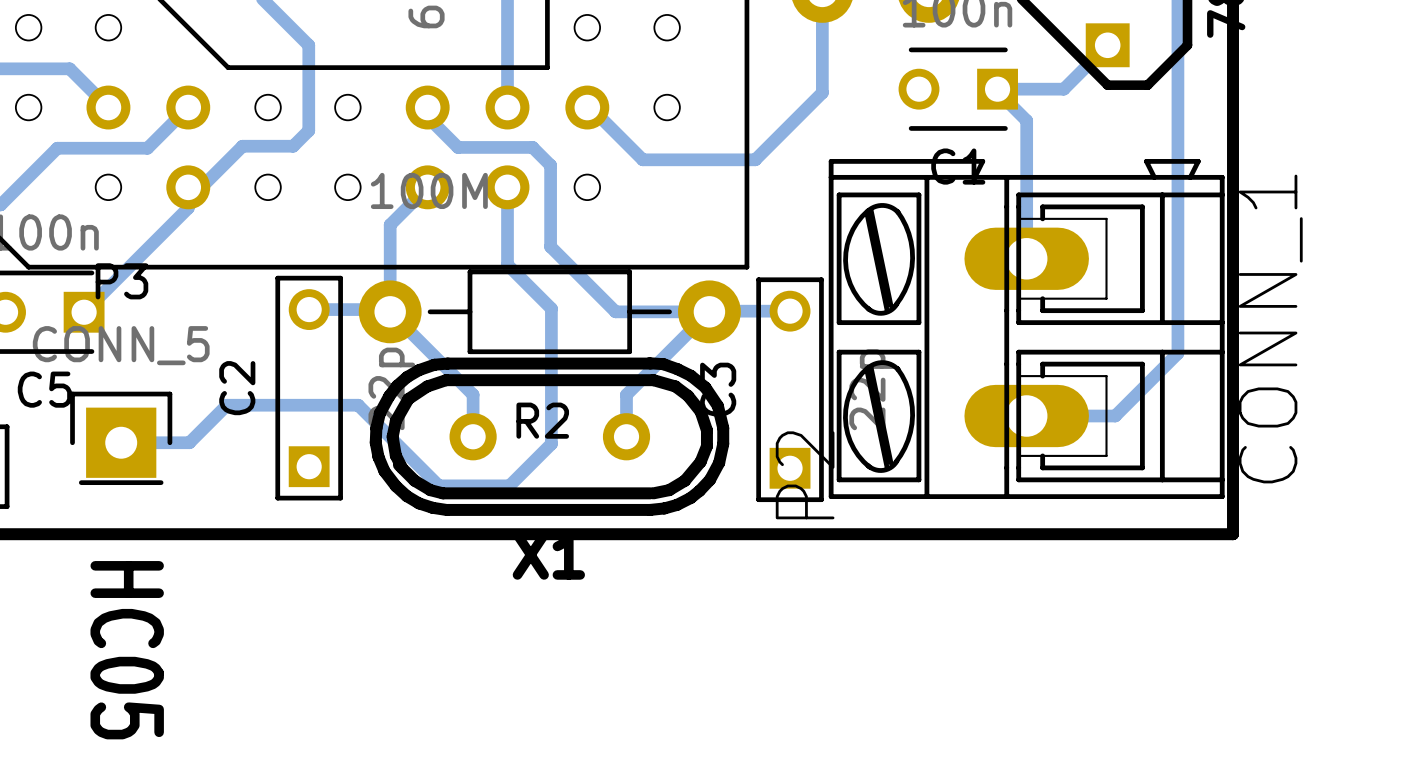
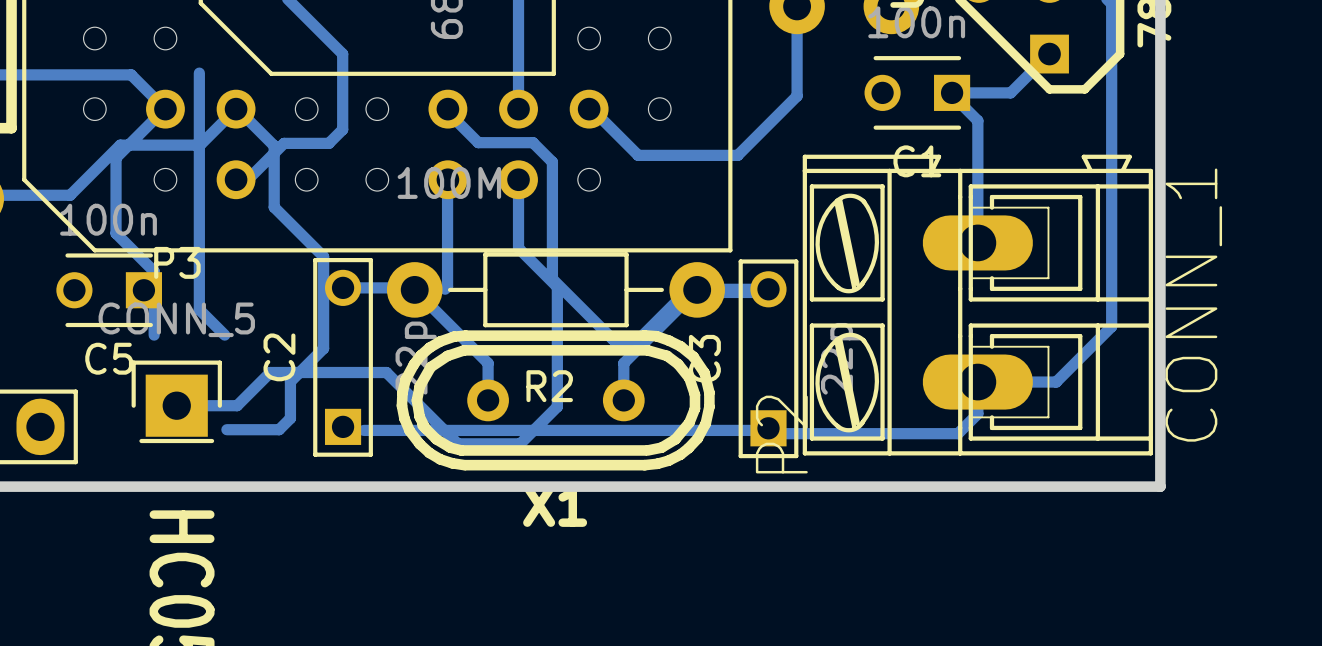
bottom track: none -> (199, 73) (199, 309) (224, 335)
bottom track: none -> (165, 108) (116, 157) (116, 233) (154, 271) (154, 335)
bottom track: none -> (237, 108) (274, 145) (274, 207) (323, 256) (323, 348) (290, 381) (290, 418) (279, 429) (226, 429)
bottom track: (427, 107) (427, 117) (458, 147) (532, 147) (550, 165) (550, 246) (615, 311) (709, 311) -> none
bottom track: none -> (447, 111) (478, 142) (533, 142) (552, 162) (552, 279) (613, 339) (638, 339) (685, 292) (762, 292)
bottom track: (188, 187) (188, 208) (84, 312) -> none
bottom track: (427, 187) (390, 224) (390, 311) -> (447, 179) (447, 286) (445, 289)
bottom track: none -> (977, 382) (977, 413) (958, 433) (762, 433)
bottom track: none -> (363, 430) (765, 430)

